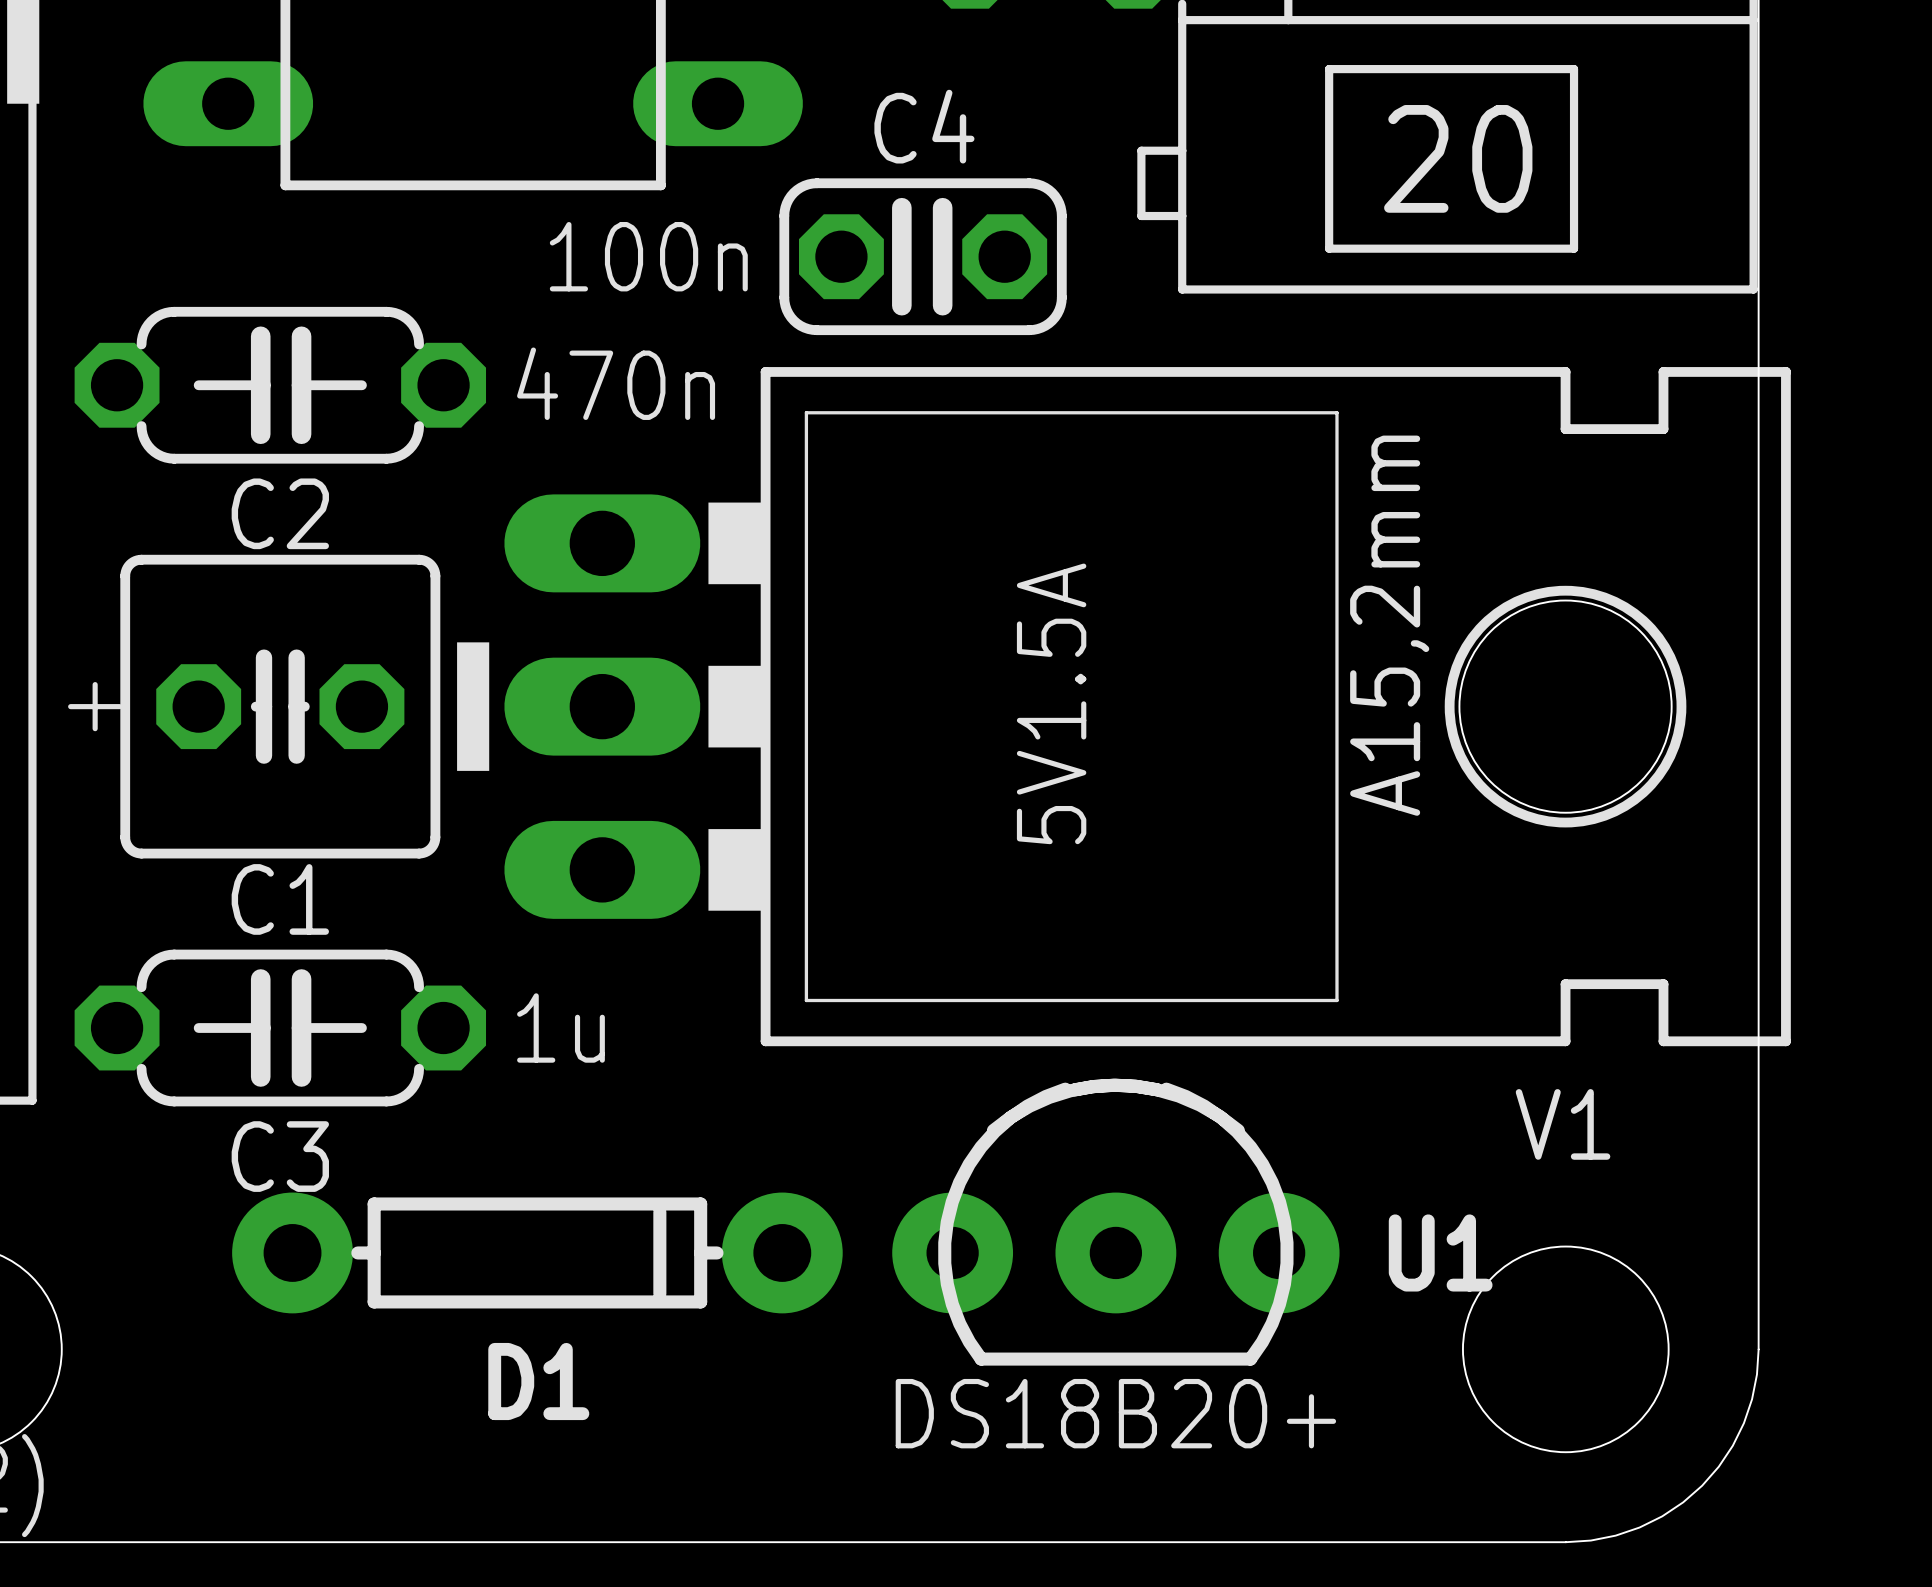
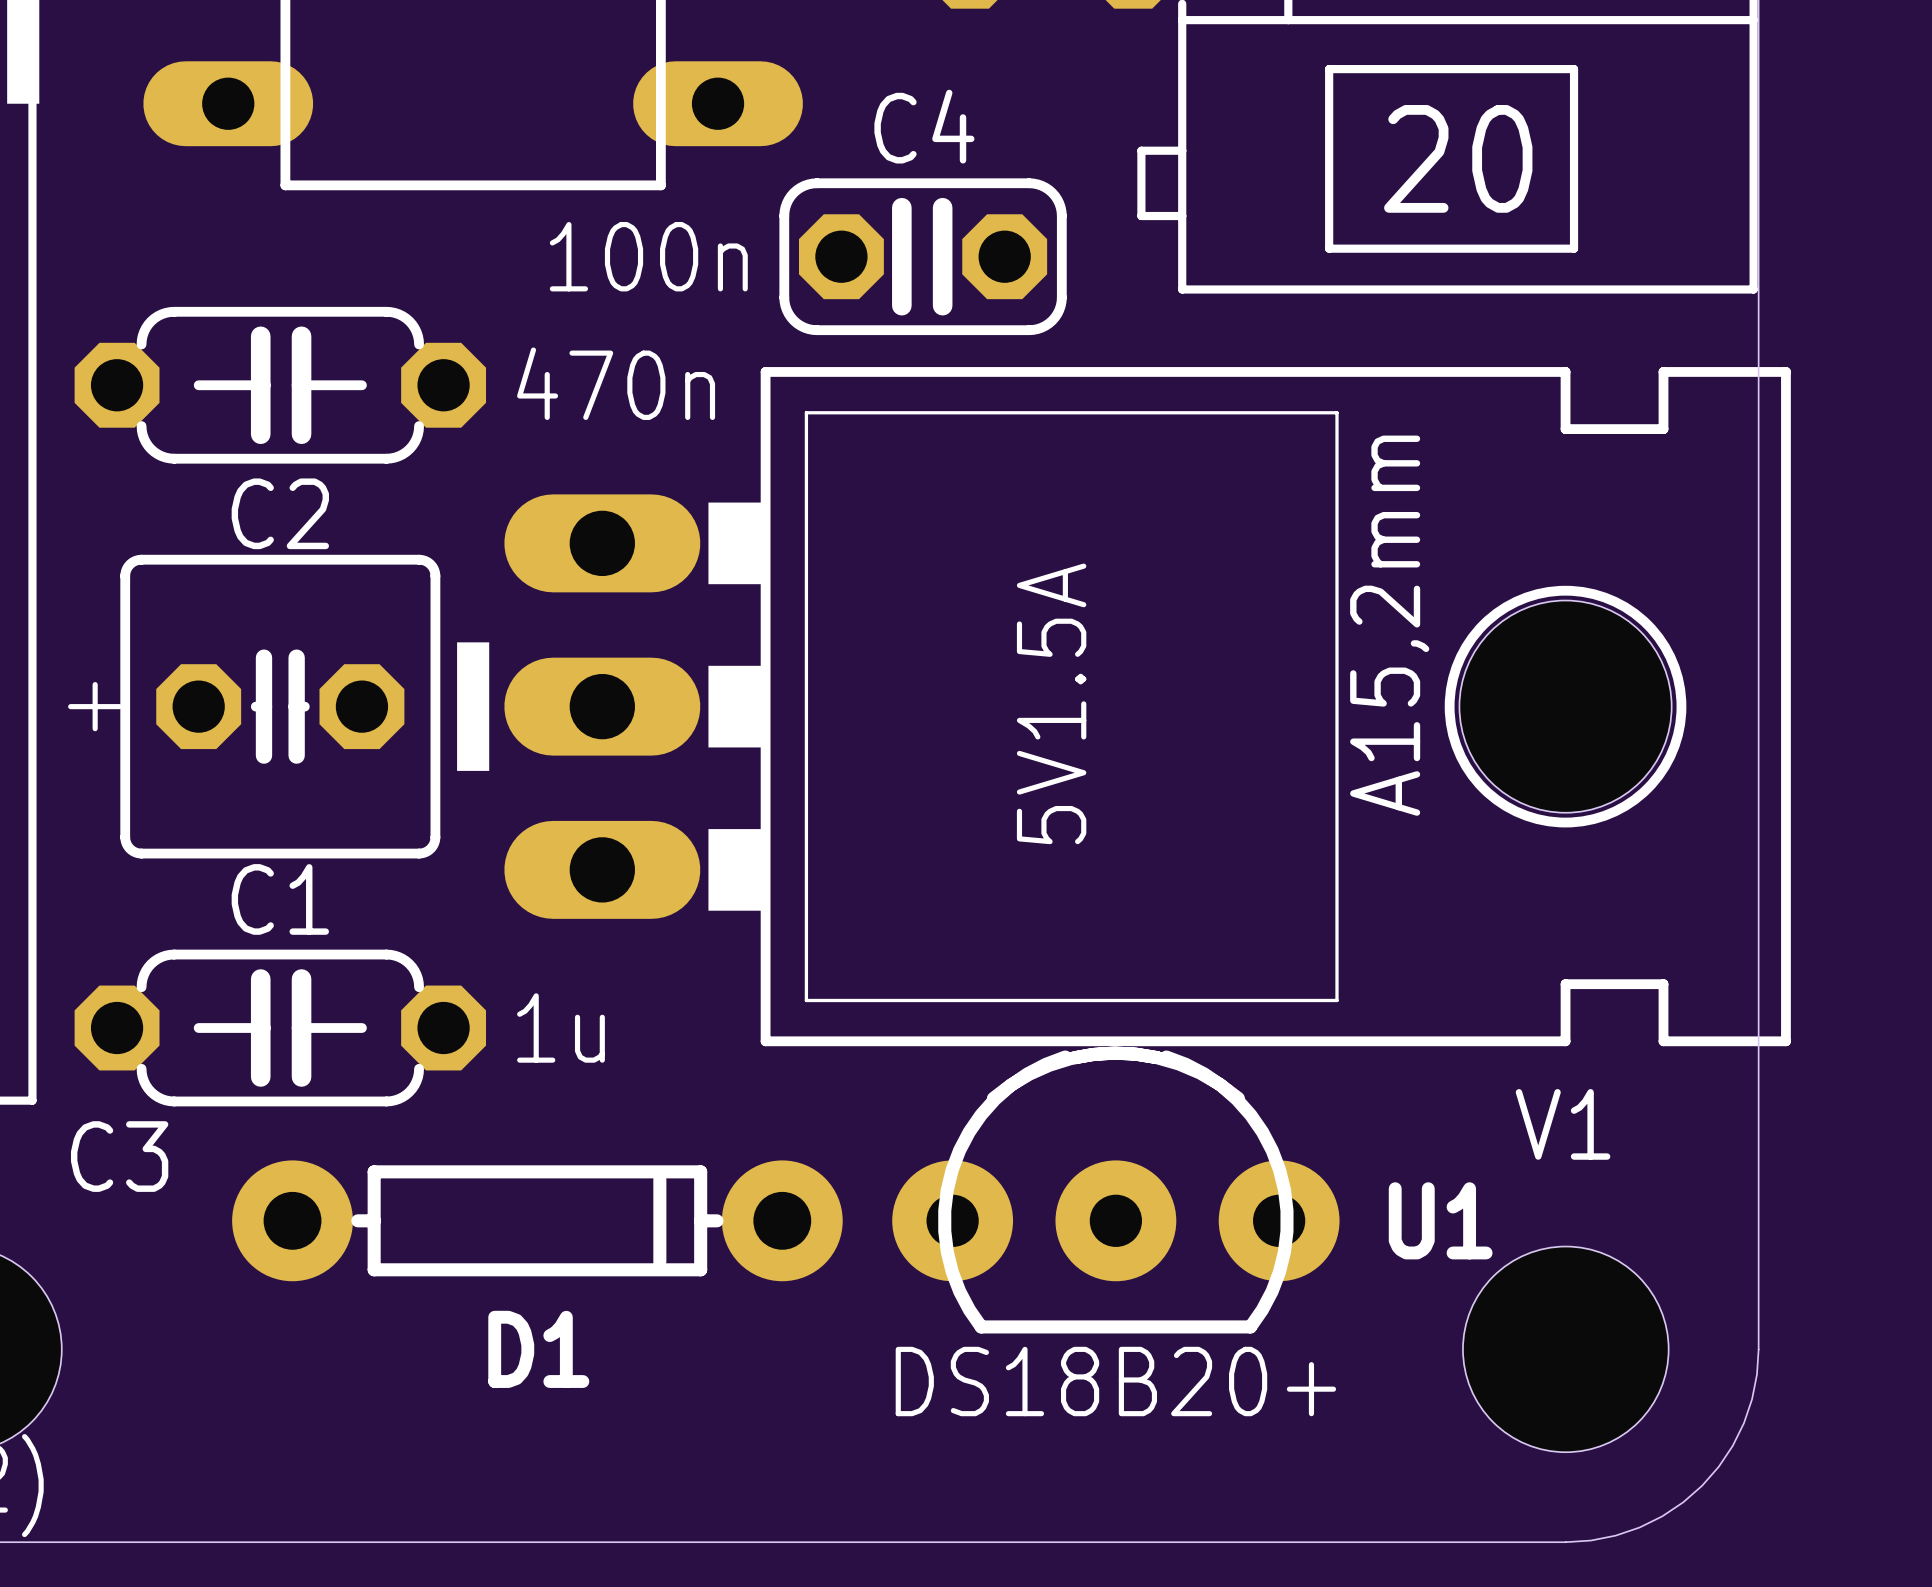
C3 name position: C3 (280, 1156) -> C3 (119, 1156)
U1 position: (1115, 1222) -> (1115, 1190)
D1 position: (537, 1252) -> (537, 1220)
text position: DS18B20+ (1115, 1413) -> DS18B20+ (1115, 1381)

